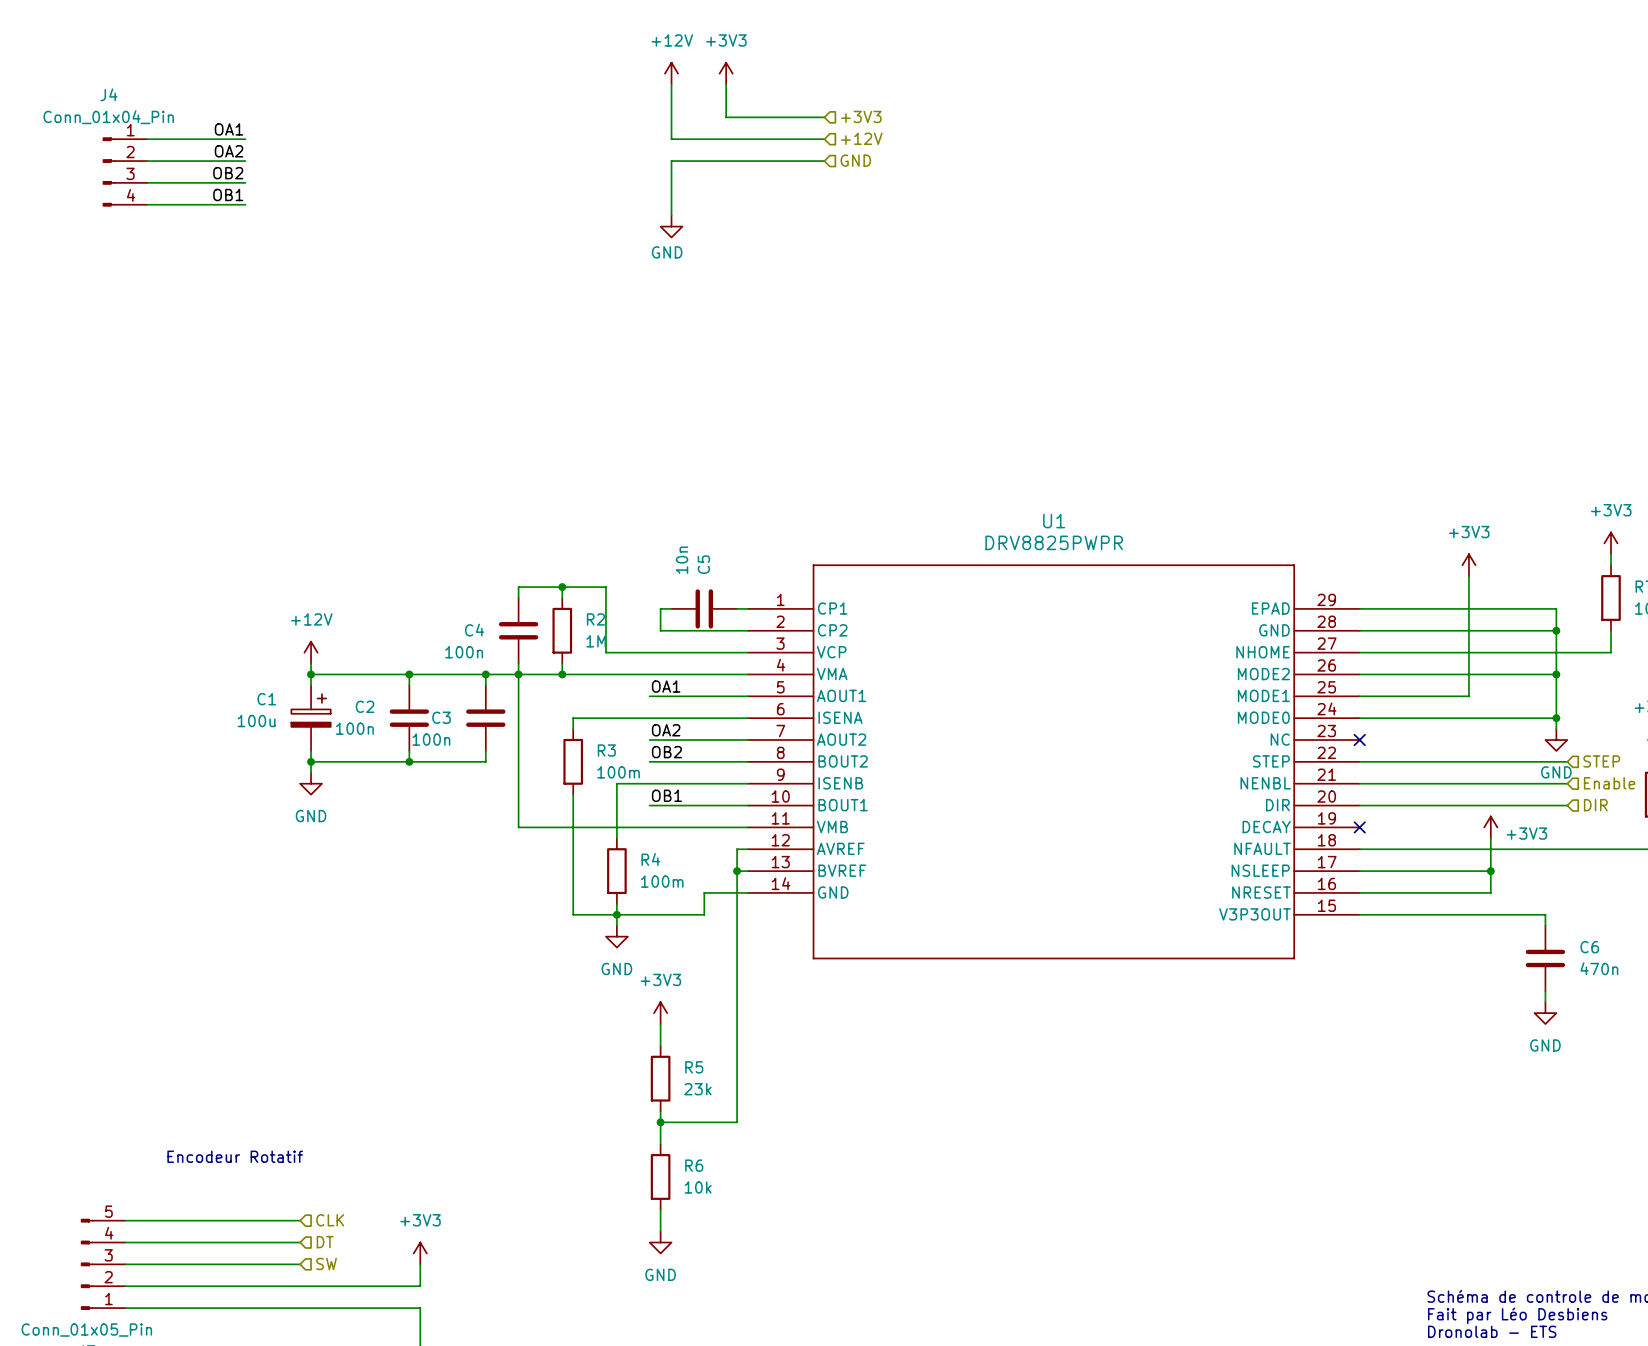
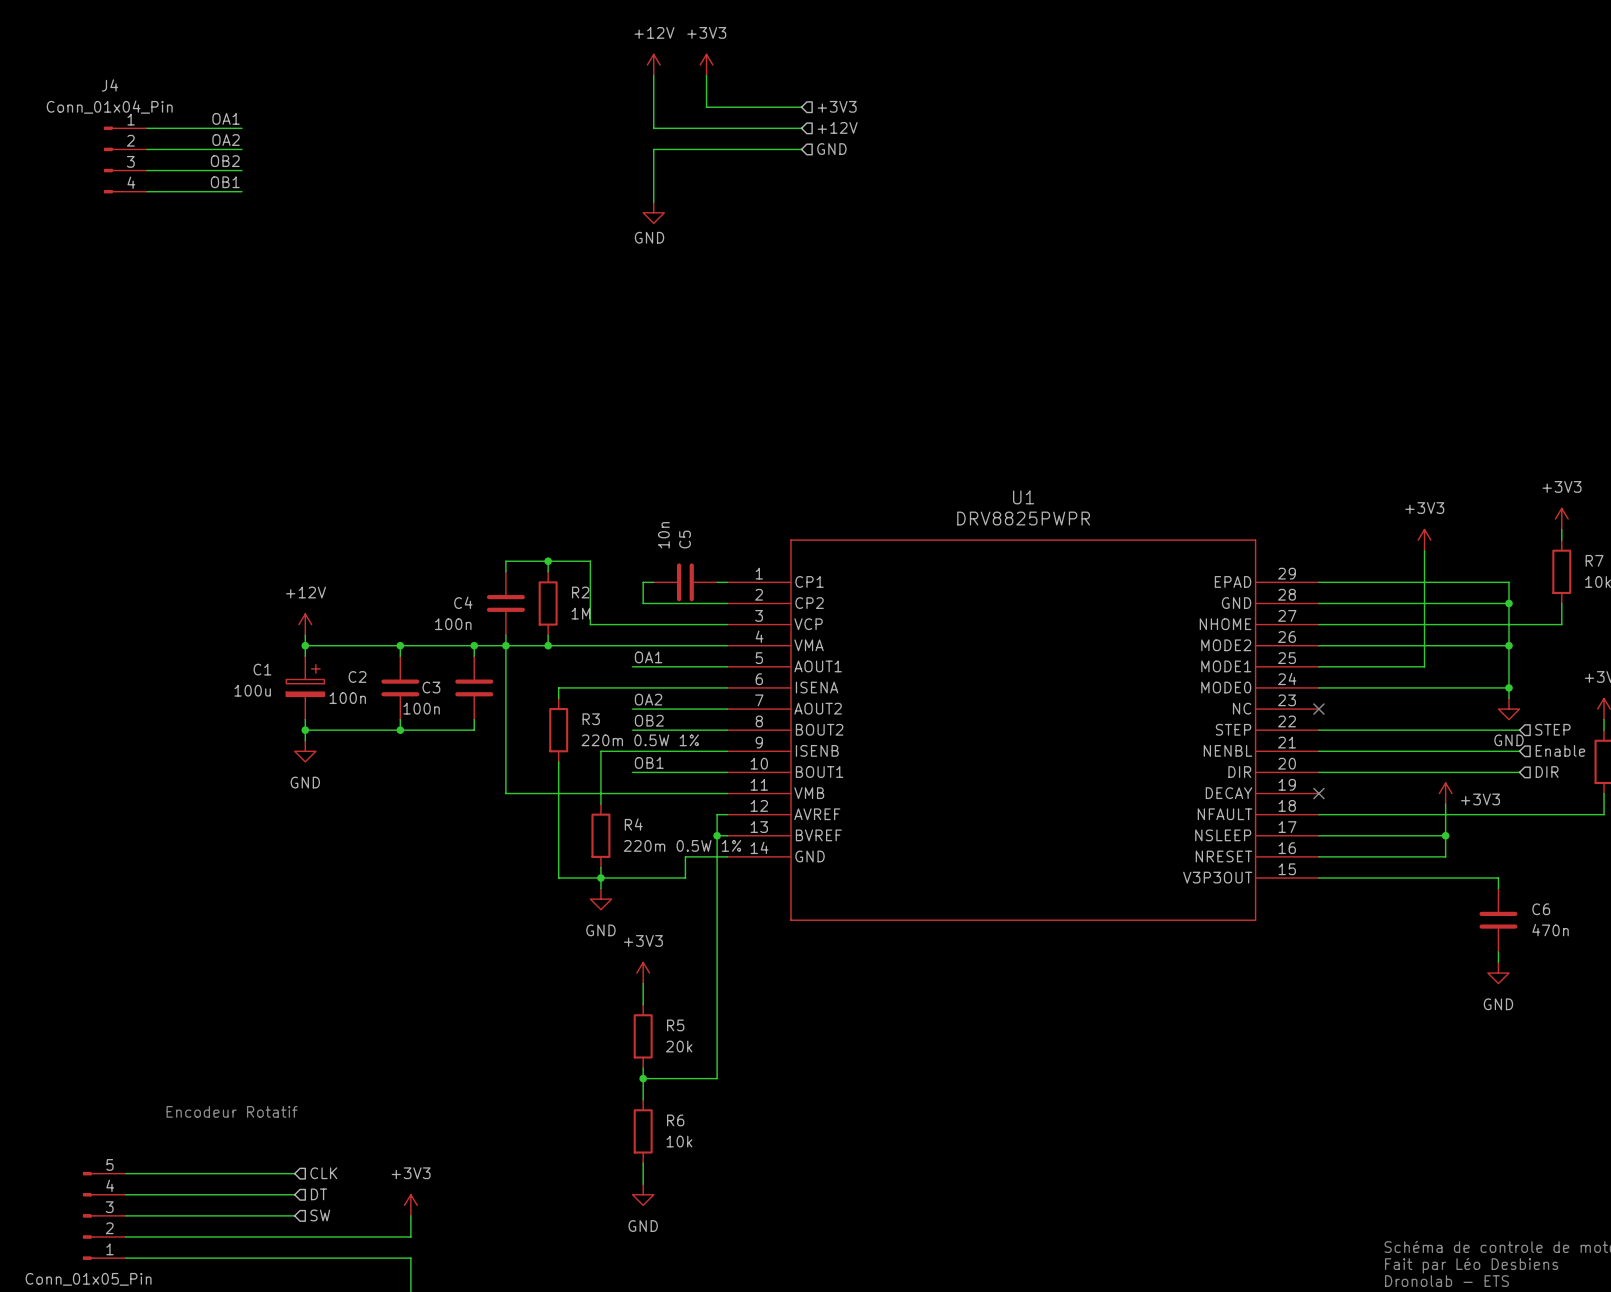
R3 value: 100m (618, 772) -> 220m 0.5W 1% (640, 740)
R4 value: 100m (662, 881) -> 220m 0.5W 1% (682, 845)
R5 value: 23k (697, 1089) -> 20k (679, 1046)

